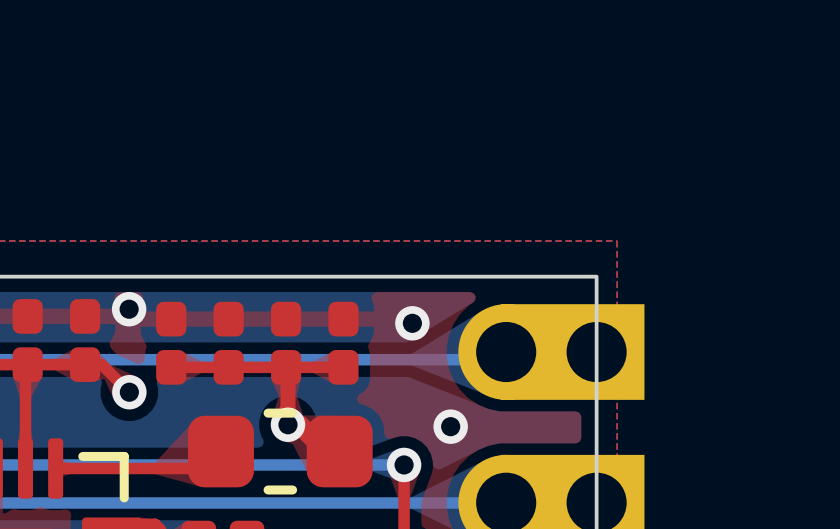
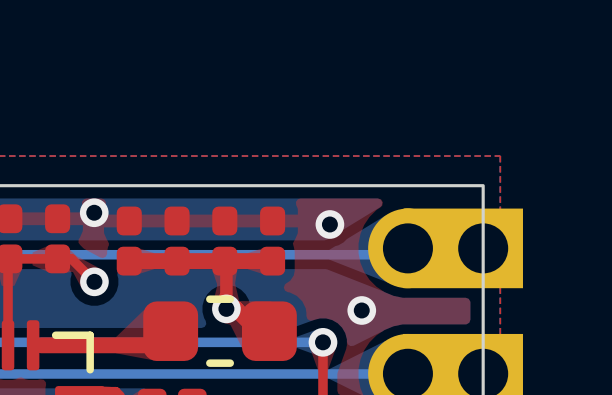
top track width: thin (171, 367) (343, 367) -> thick (129, 261) (272, 261)
top track width: thin (220, 451) (204, 468) (65, 468) -> thick (170, 331) (156, 345) (41, 345)

